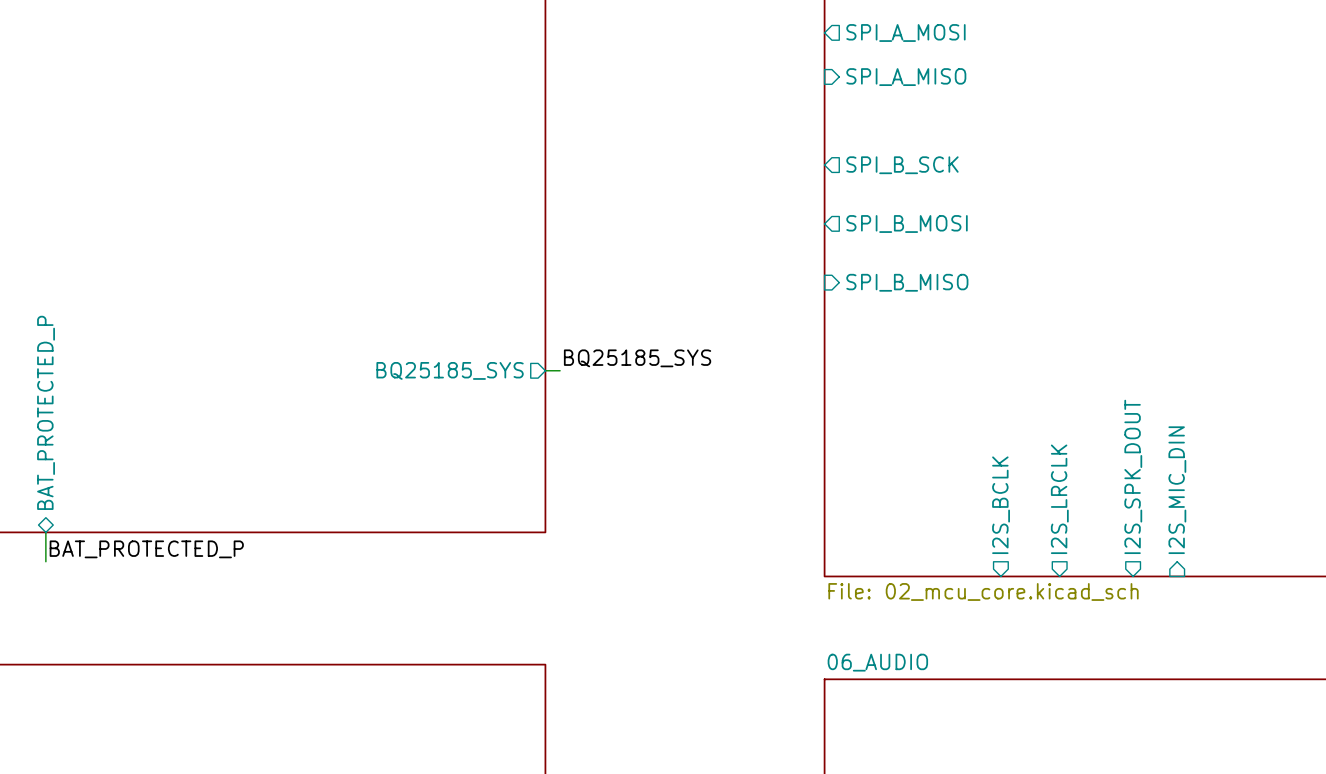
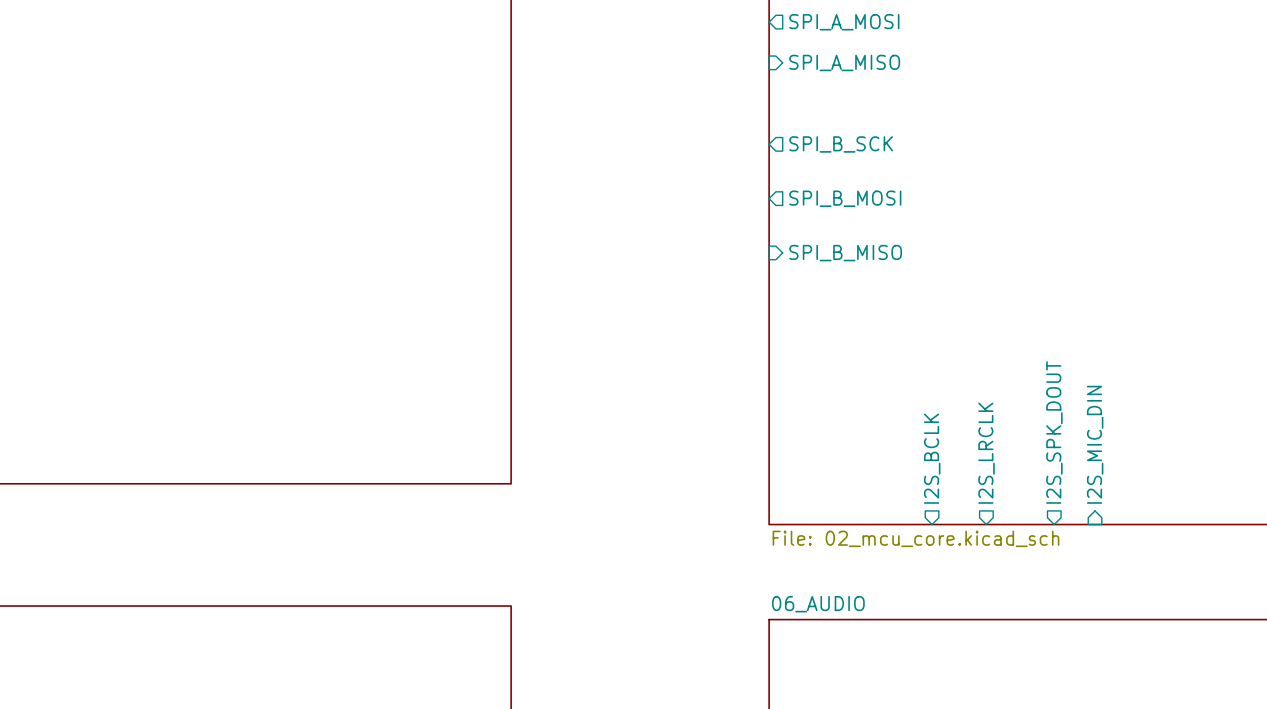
label: BQ25185_SYS (637, 358) -> none
sheet pin: BQ25185_SYS (450, 370) -> none
wire: (545, 370) (560, 370) -> none
sheet pin: BAT_PROTECTED_P (46, 412) -> none
wire: (45, 532) (45, 561) -> none
label: BAT_PROTECTED_P (146, 549) -> none

